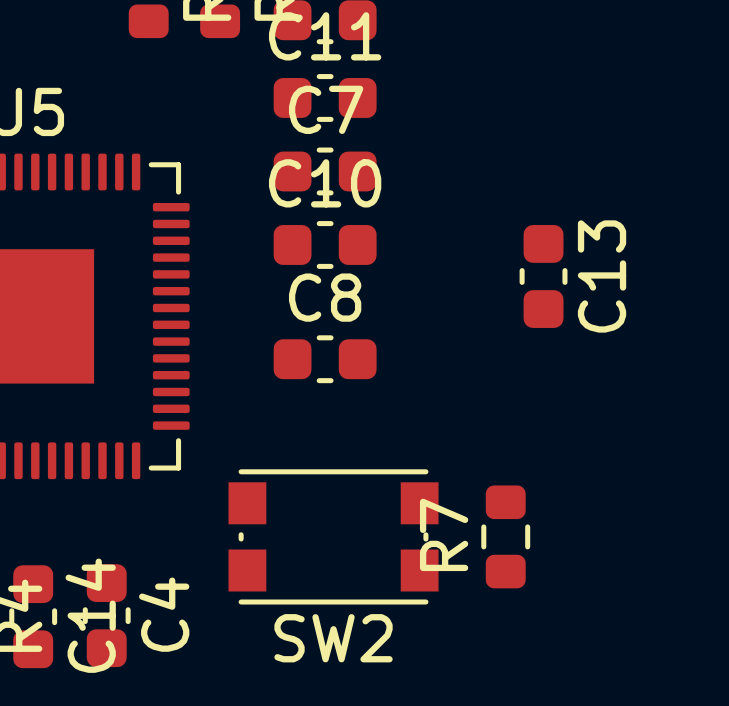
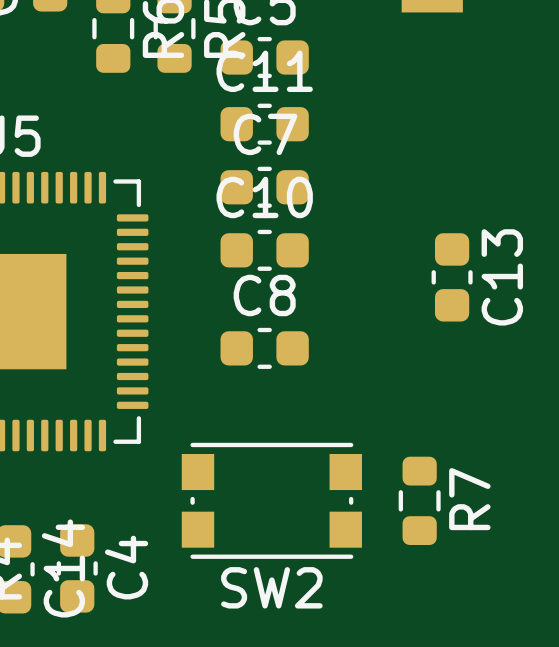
R7 name position: R7 (444, 534) -> R7 (469, 499)

